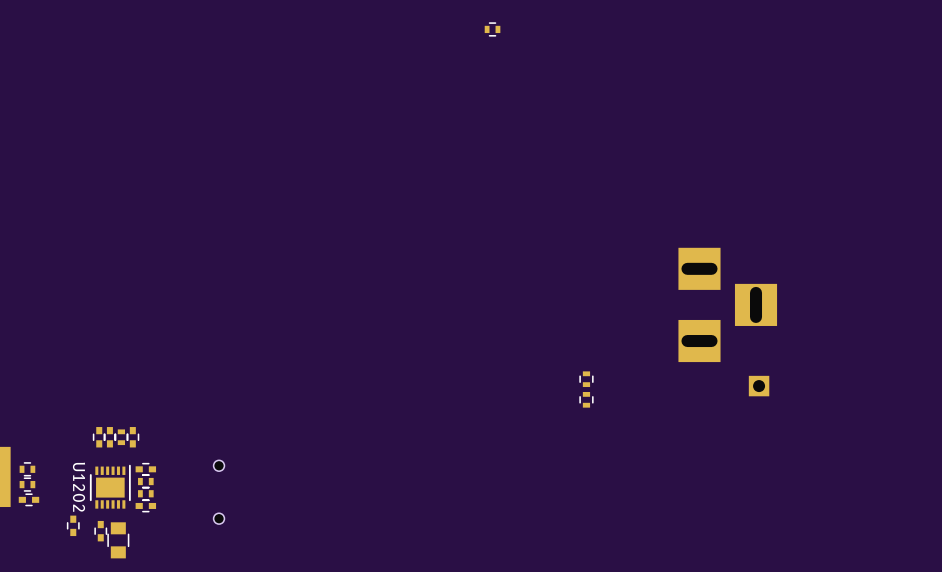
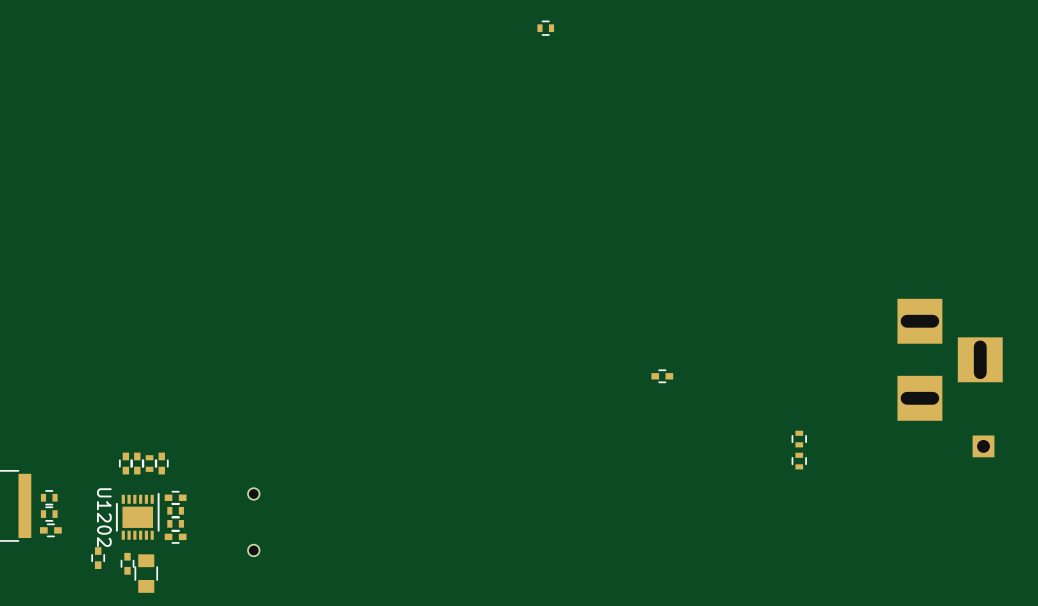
part position: (727, 304) -> (950, 359)
part: none -> (662, 376)
part: (586, 379) -> none
part position: (759, 386) -> (983, 446)
part: (586, 399) -> none
part: none -> (799, 439)
part: none -> (799, 461)

